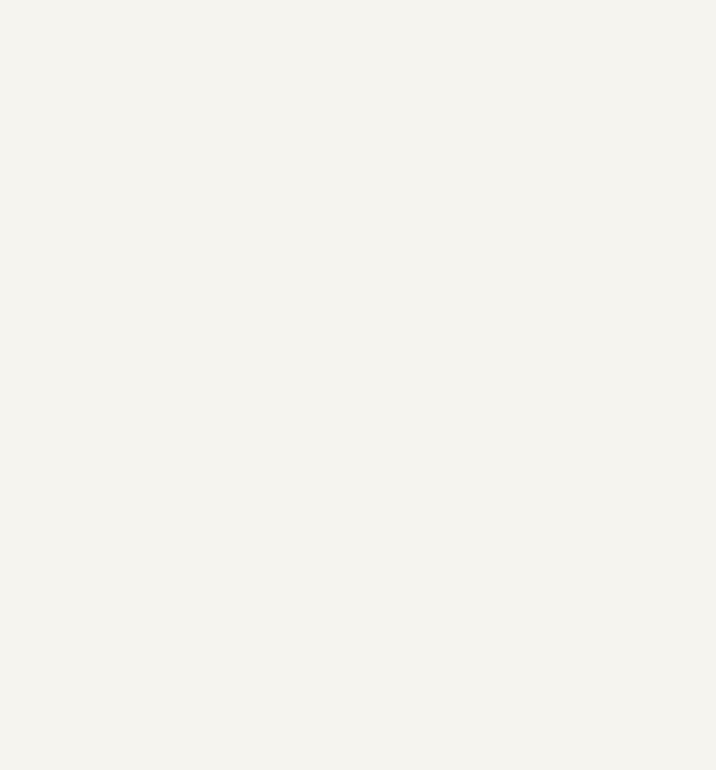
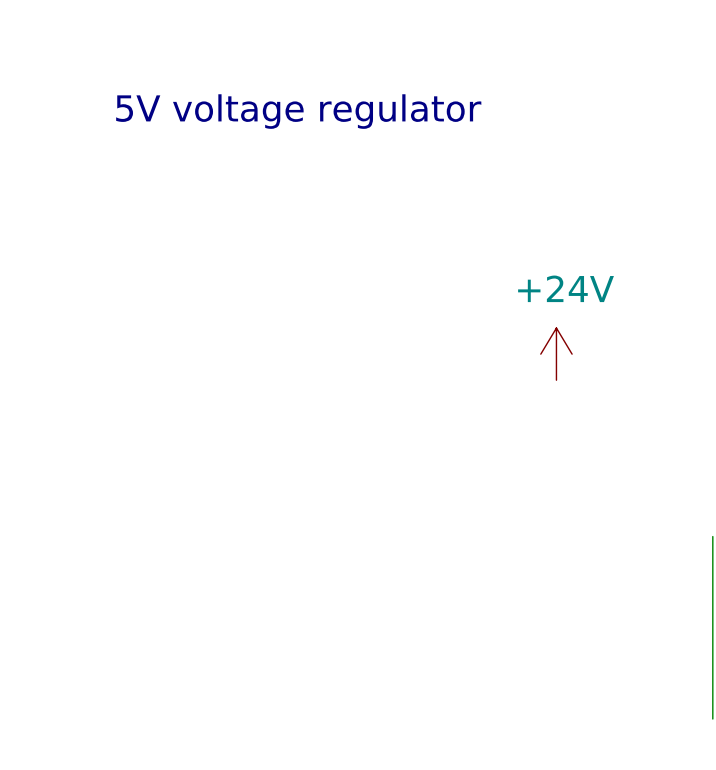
text: none -> 5V voltage regulator (298, 111)
power symbol: none -> +24V (556, 354)
wire: none -> (712, 536) (712, 719)

